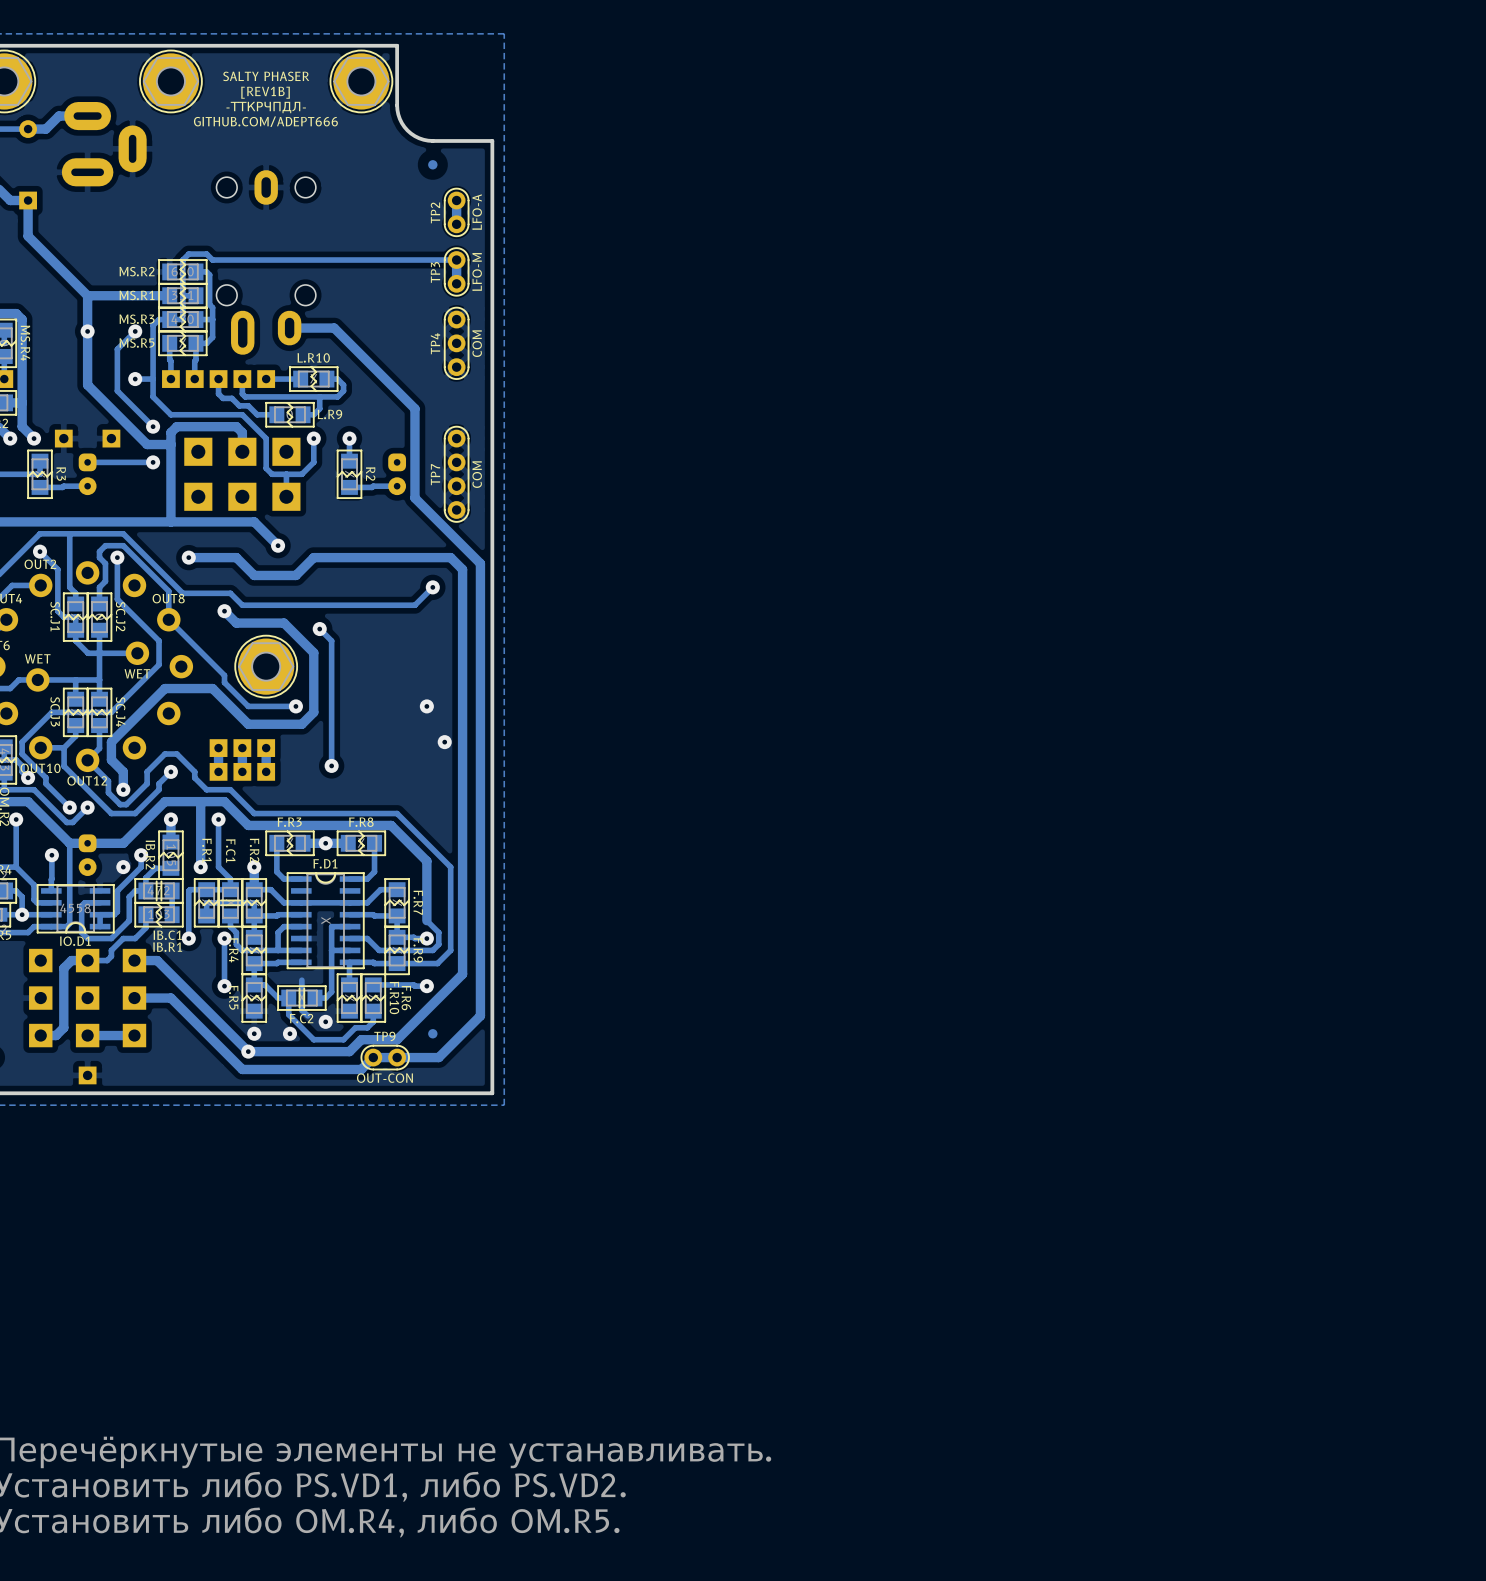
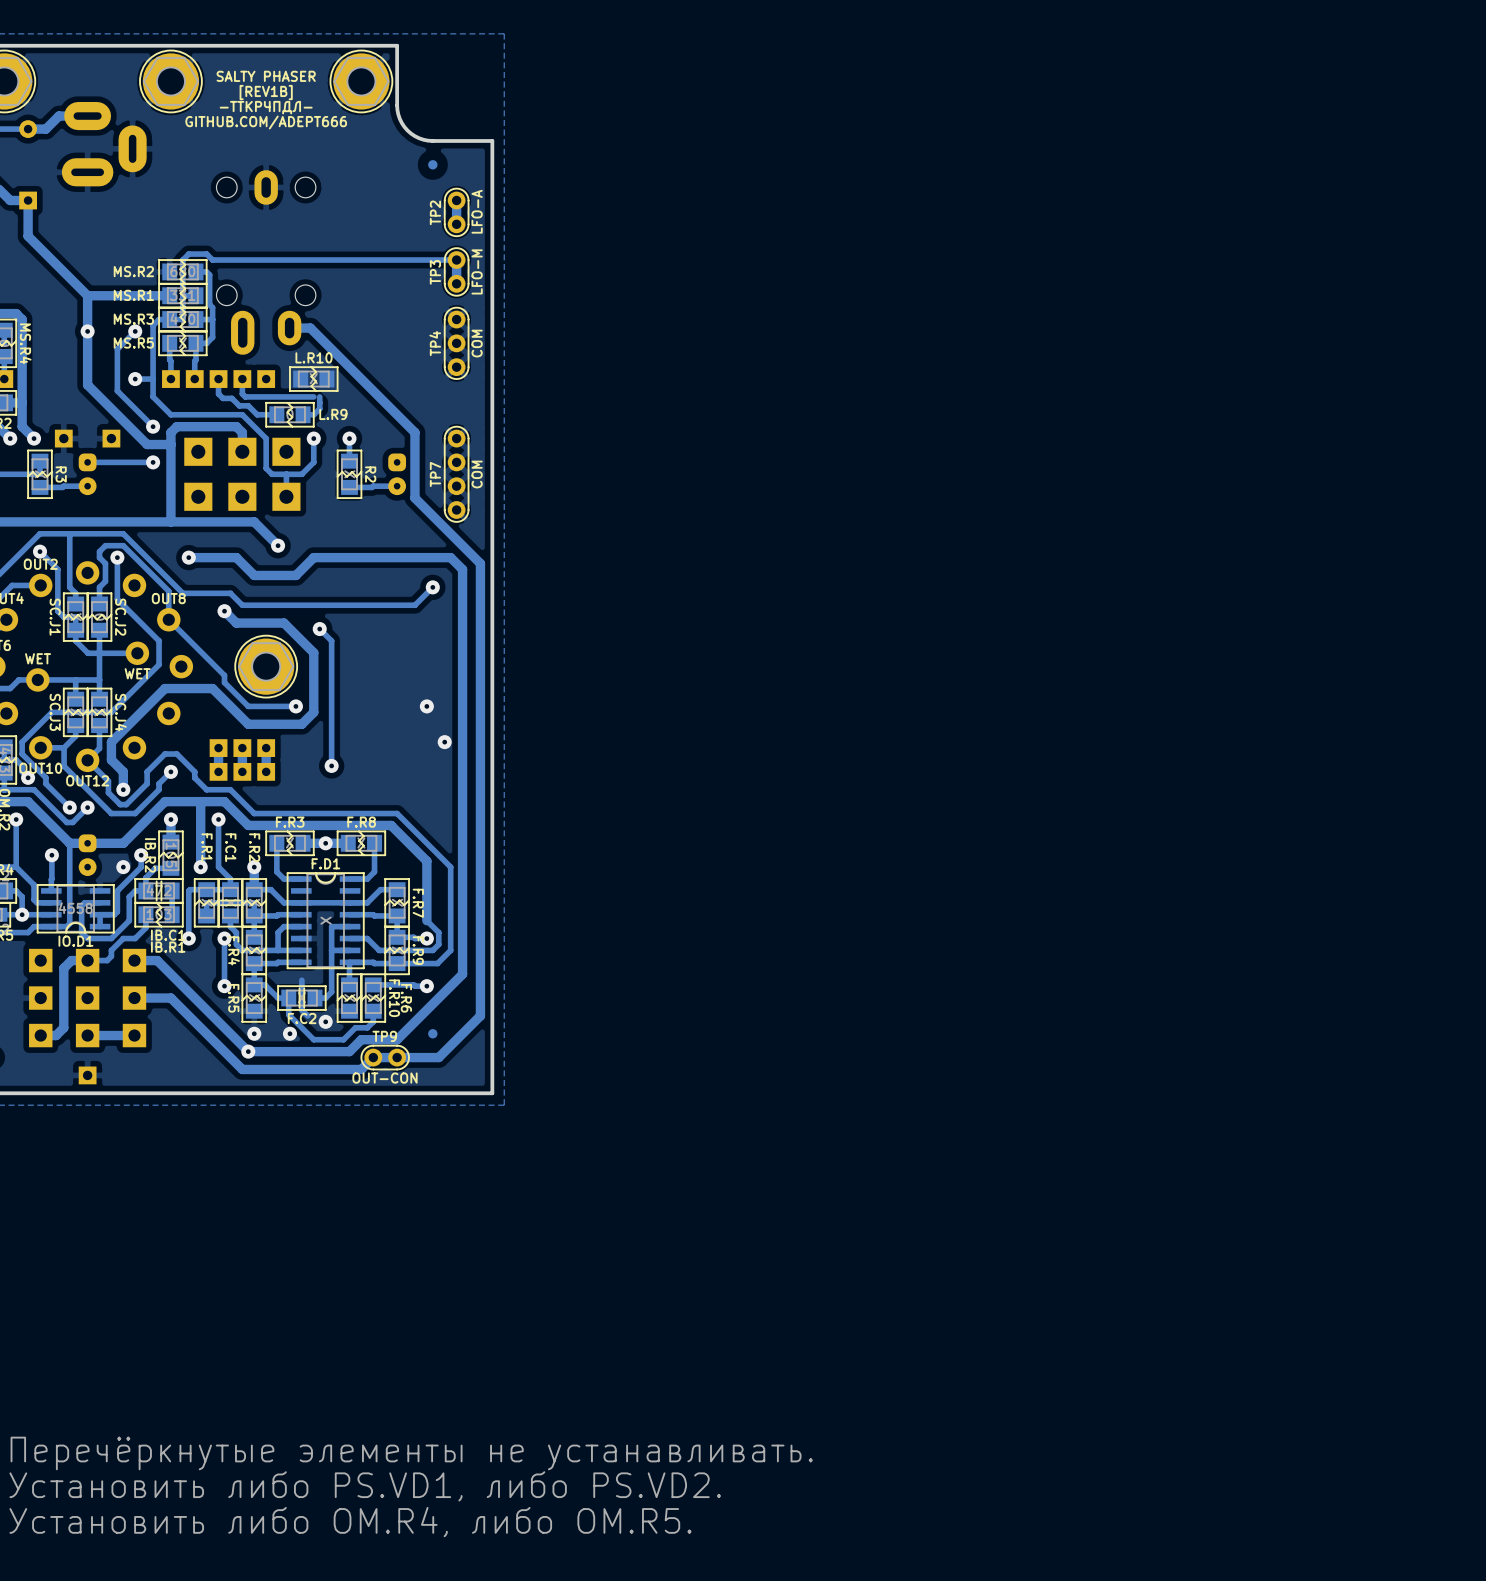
track: (310, 328) (334, 328) (414, 408) (414, 432) -> (310, 328) (414, 432)
track: (300, 379) (266, 379) -> none
track: (326, 379) (337, 379) (343, 385) (343, 390) (337, 396) (313, 396) -> none

